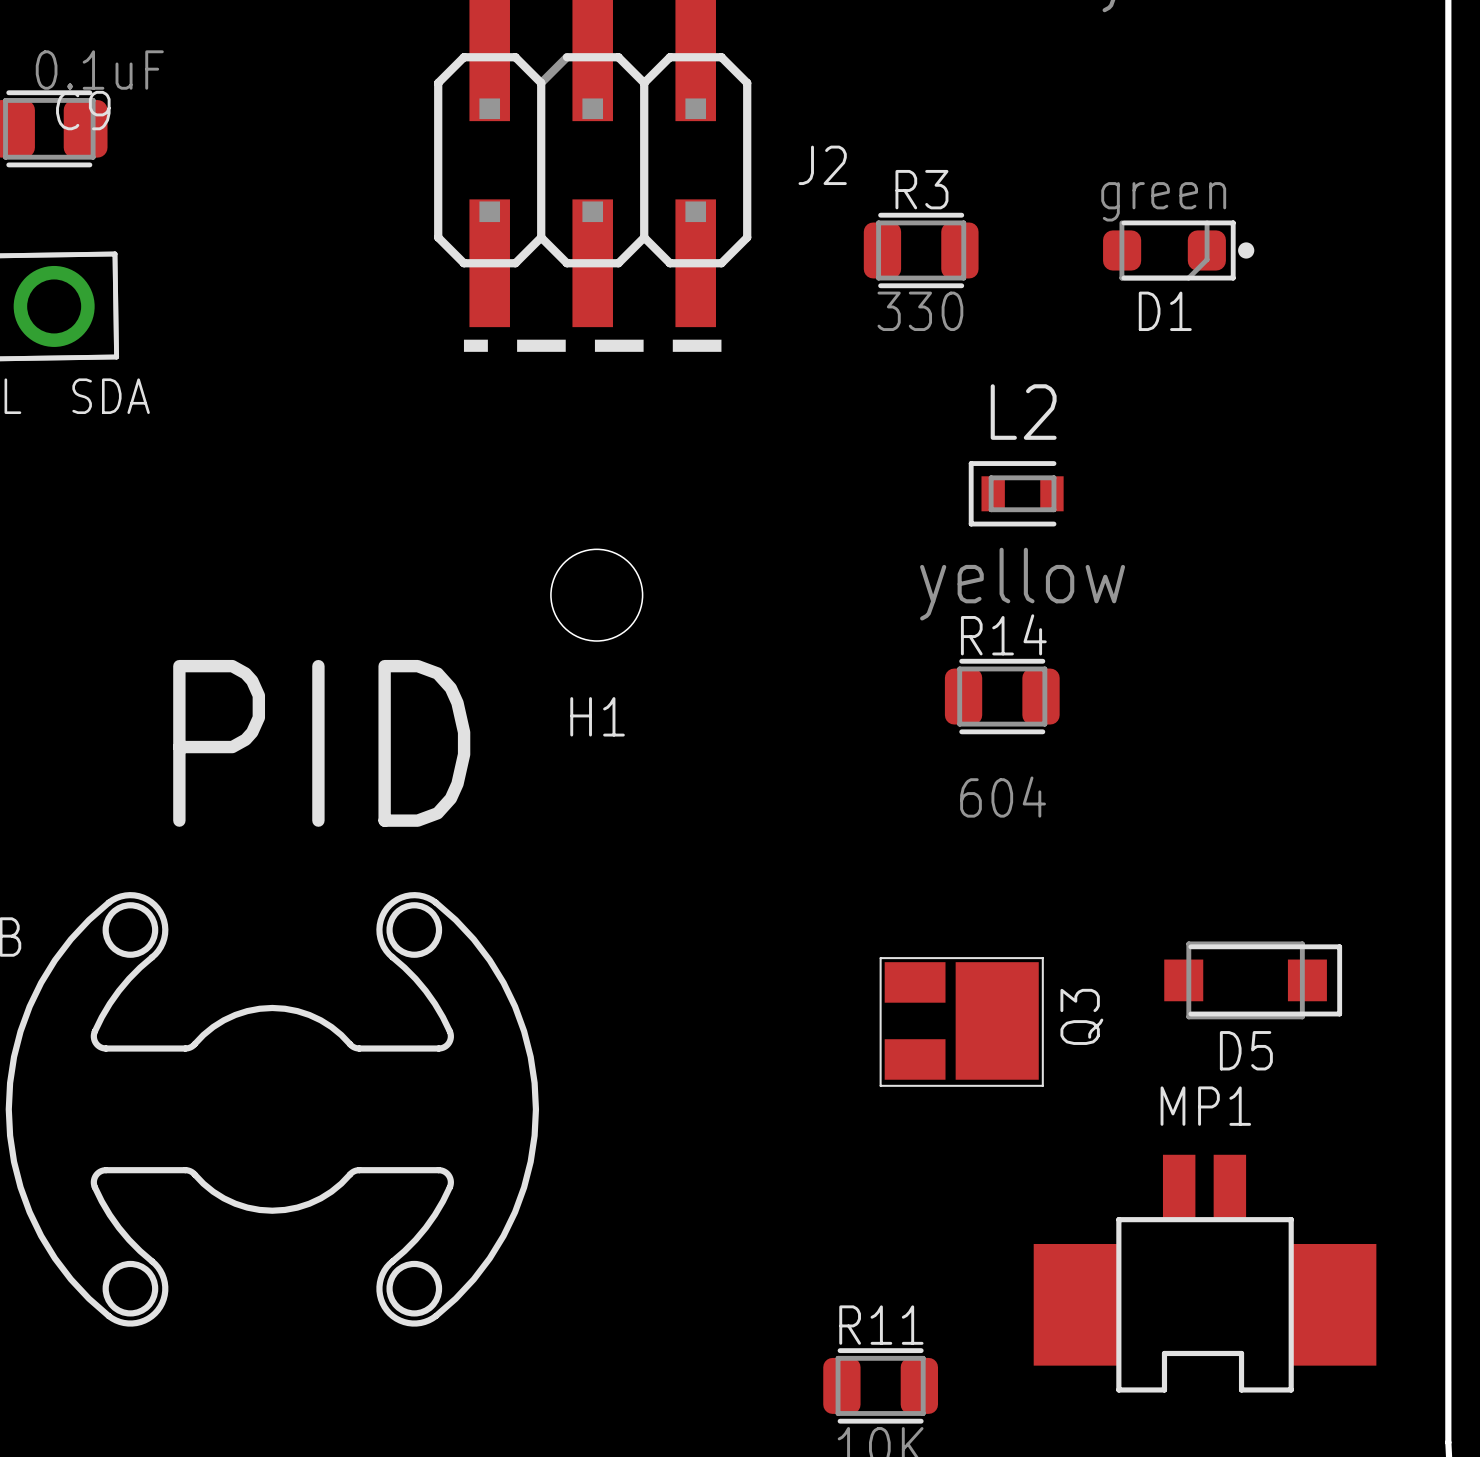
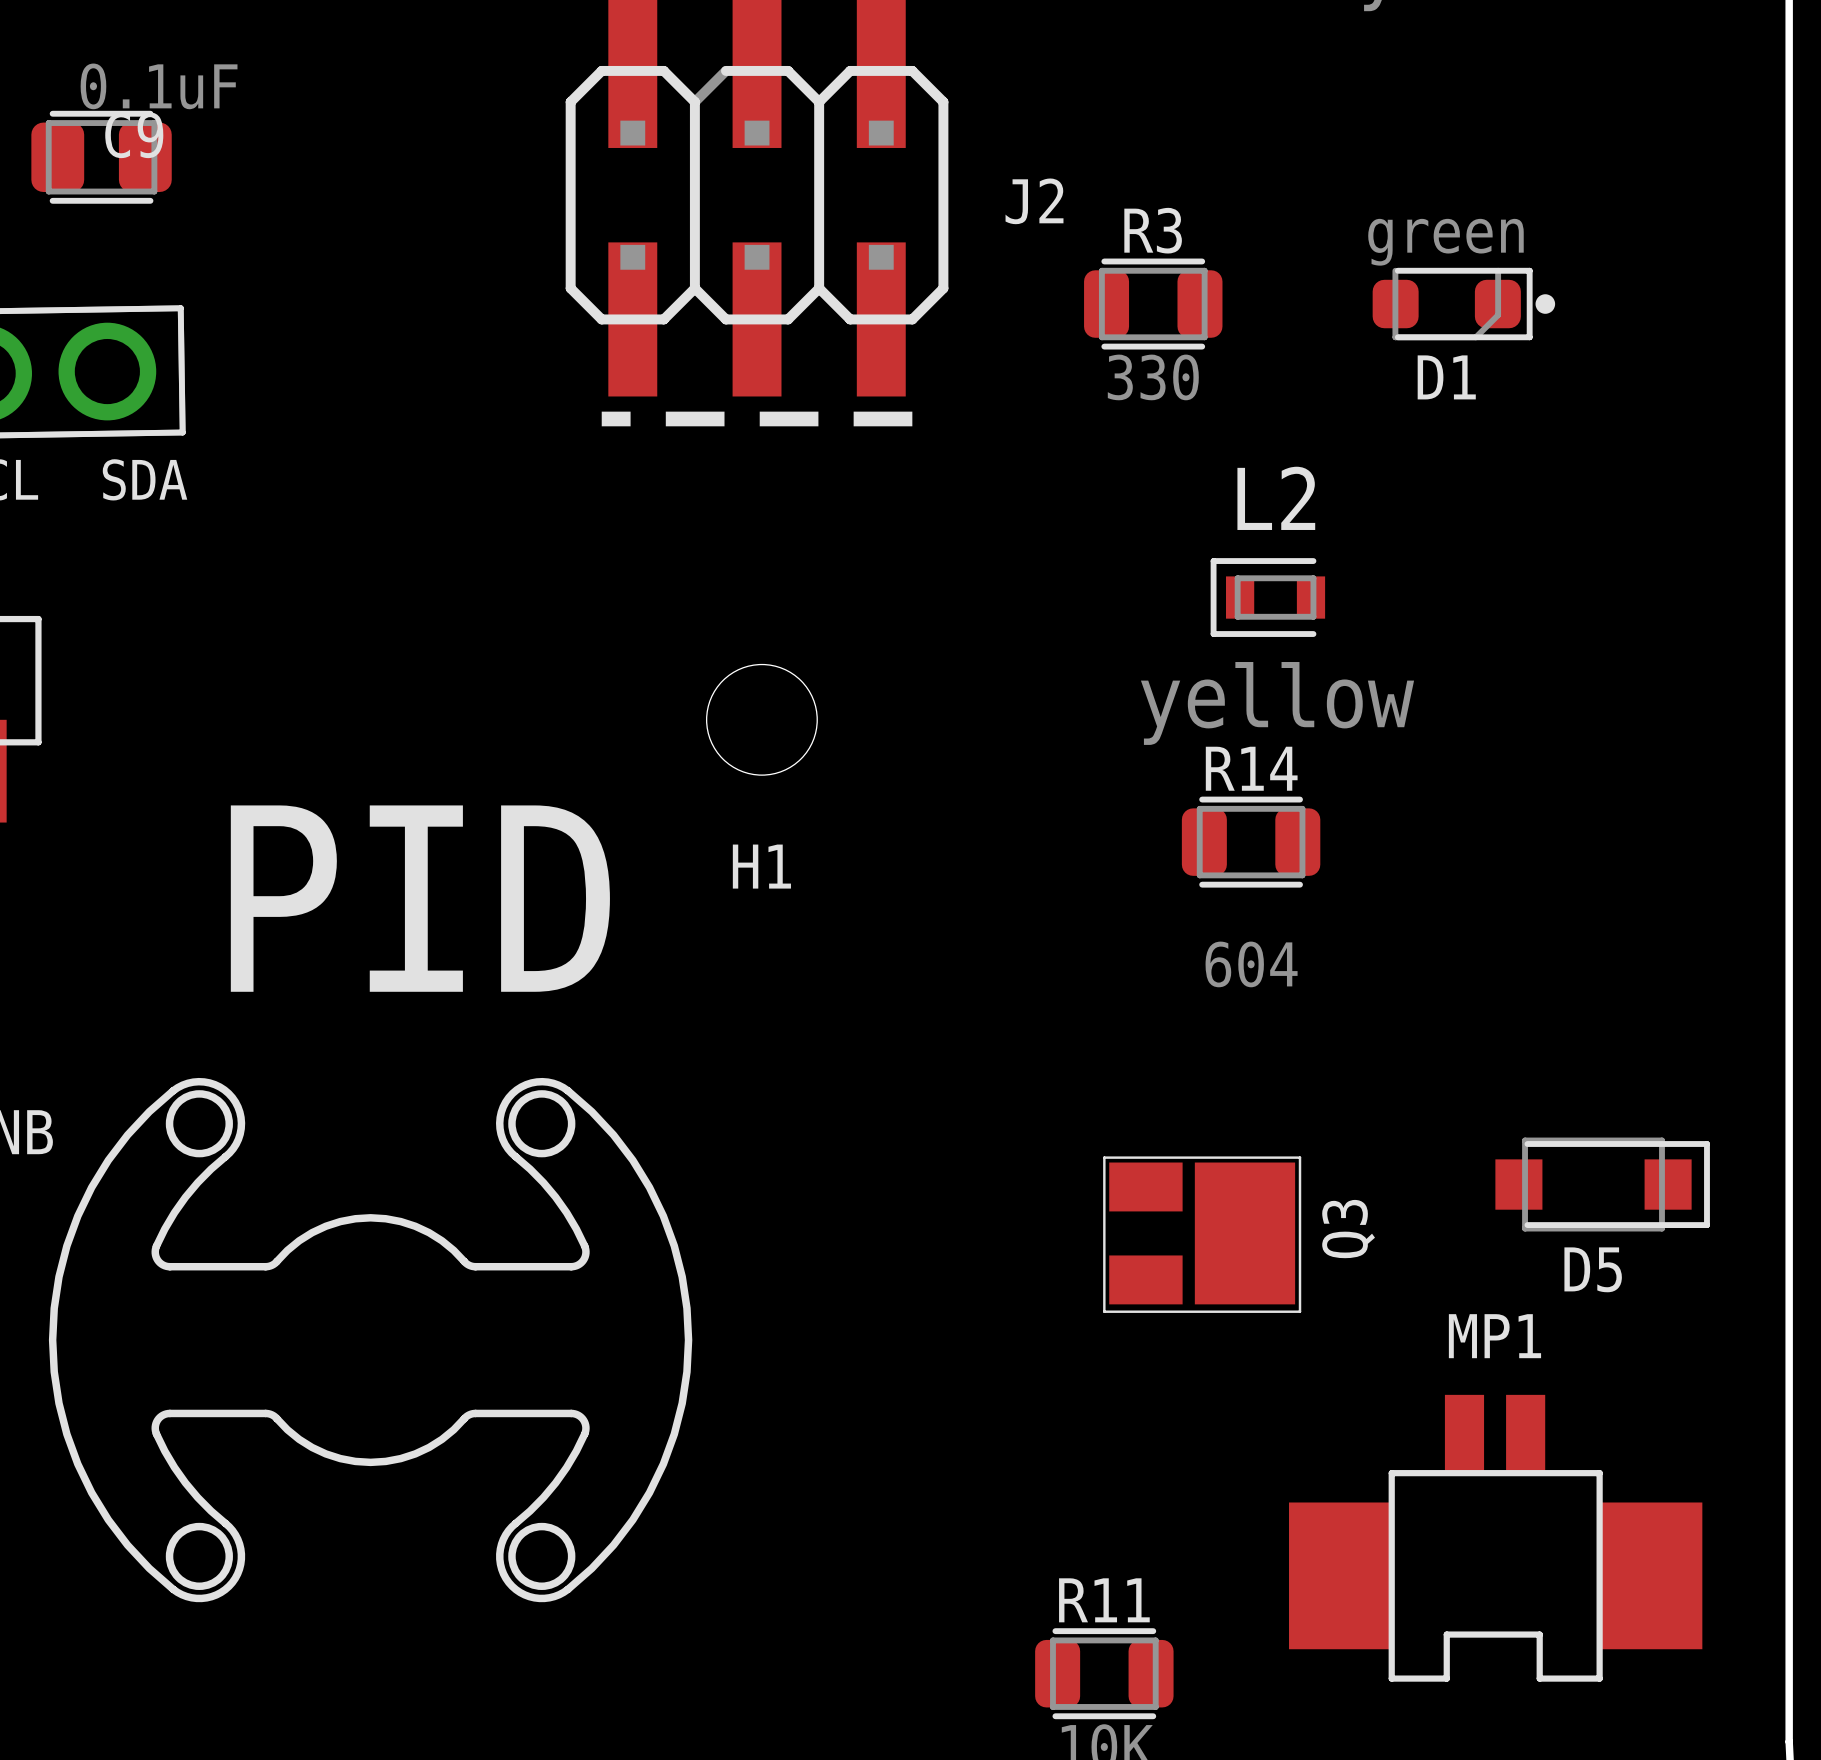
D5 position: (1253, 980) -> (1602, 1184)

